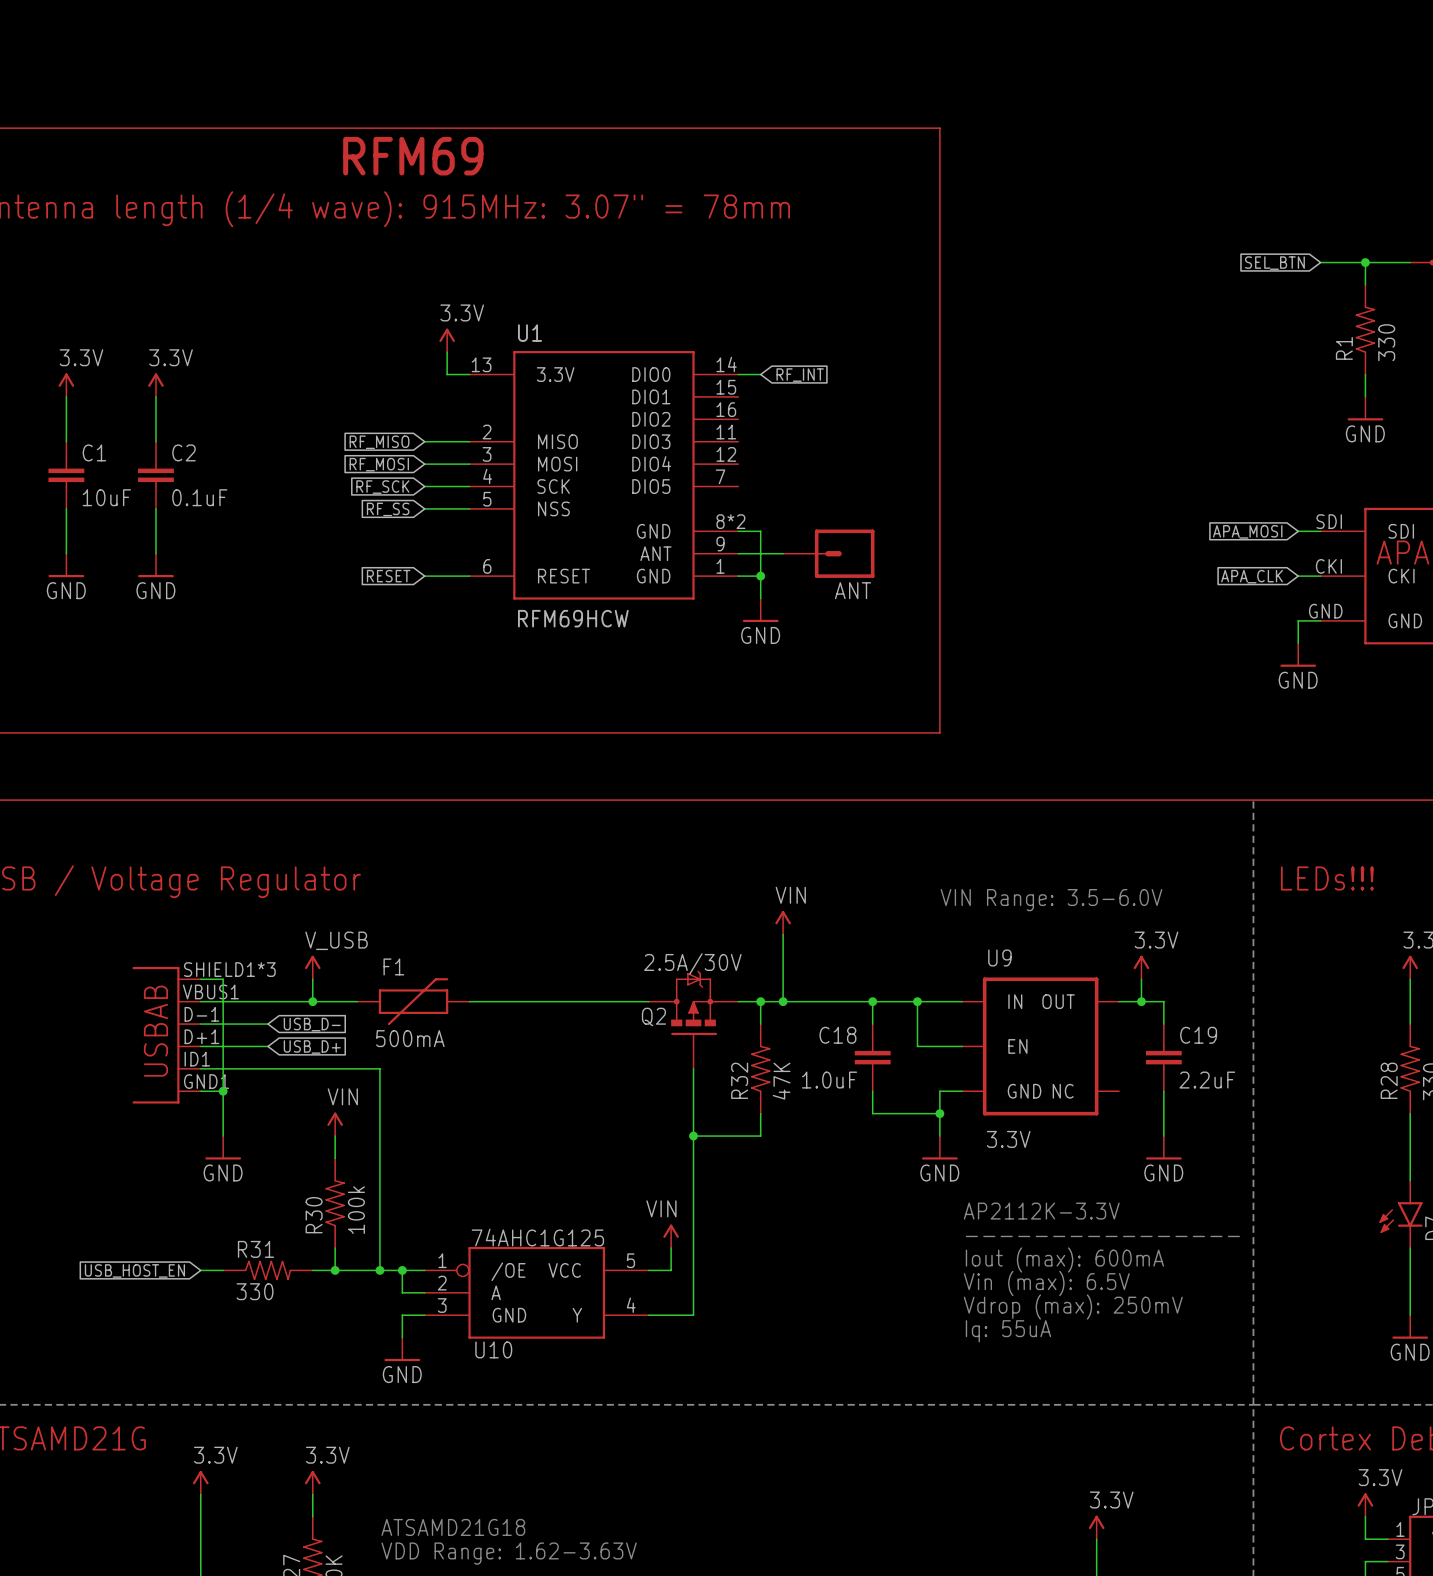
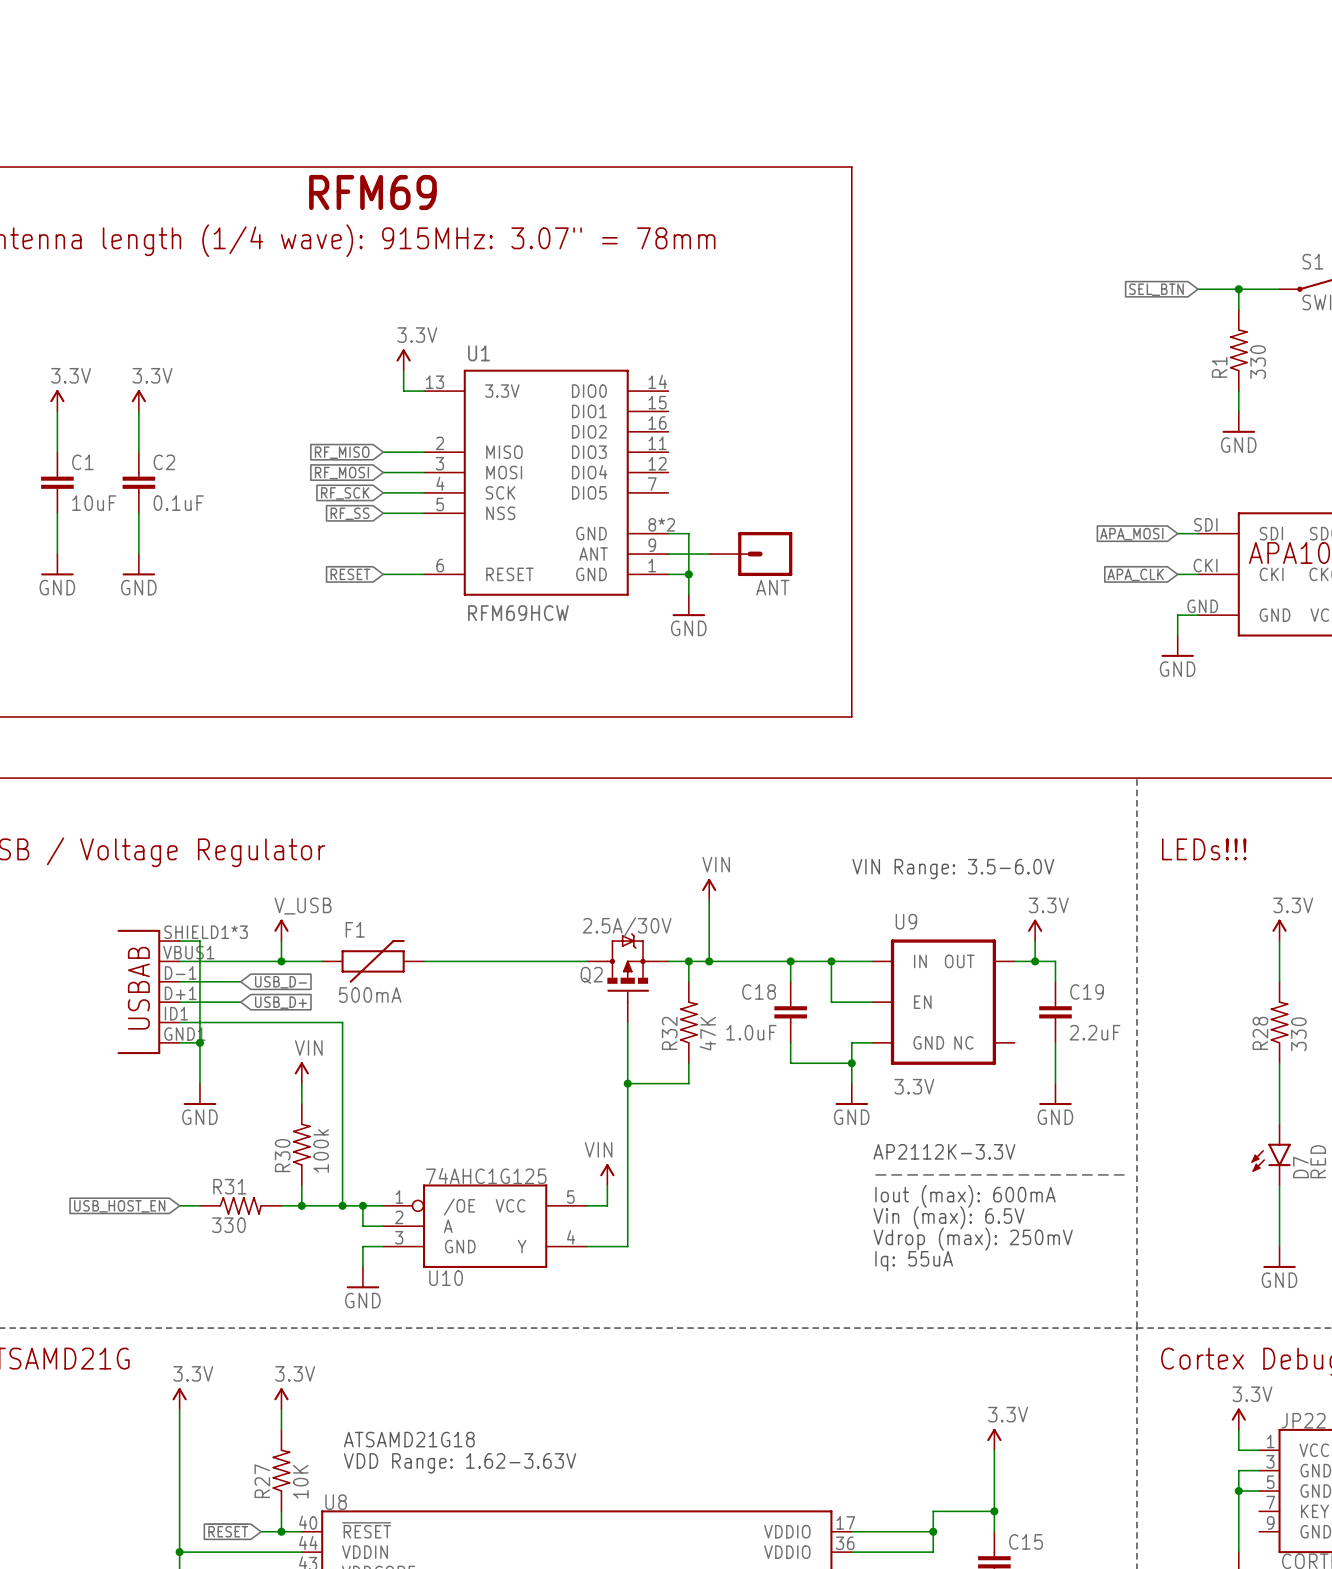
wire: (738, 374) (760, 374) -> none
global label: RF_INT (800, 375) -> none

